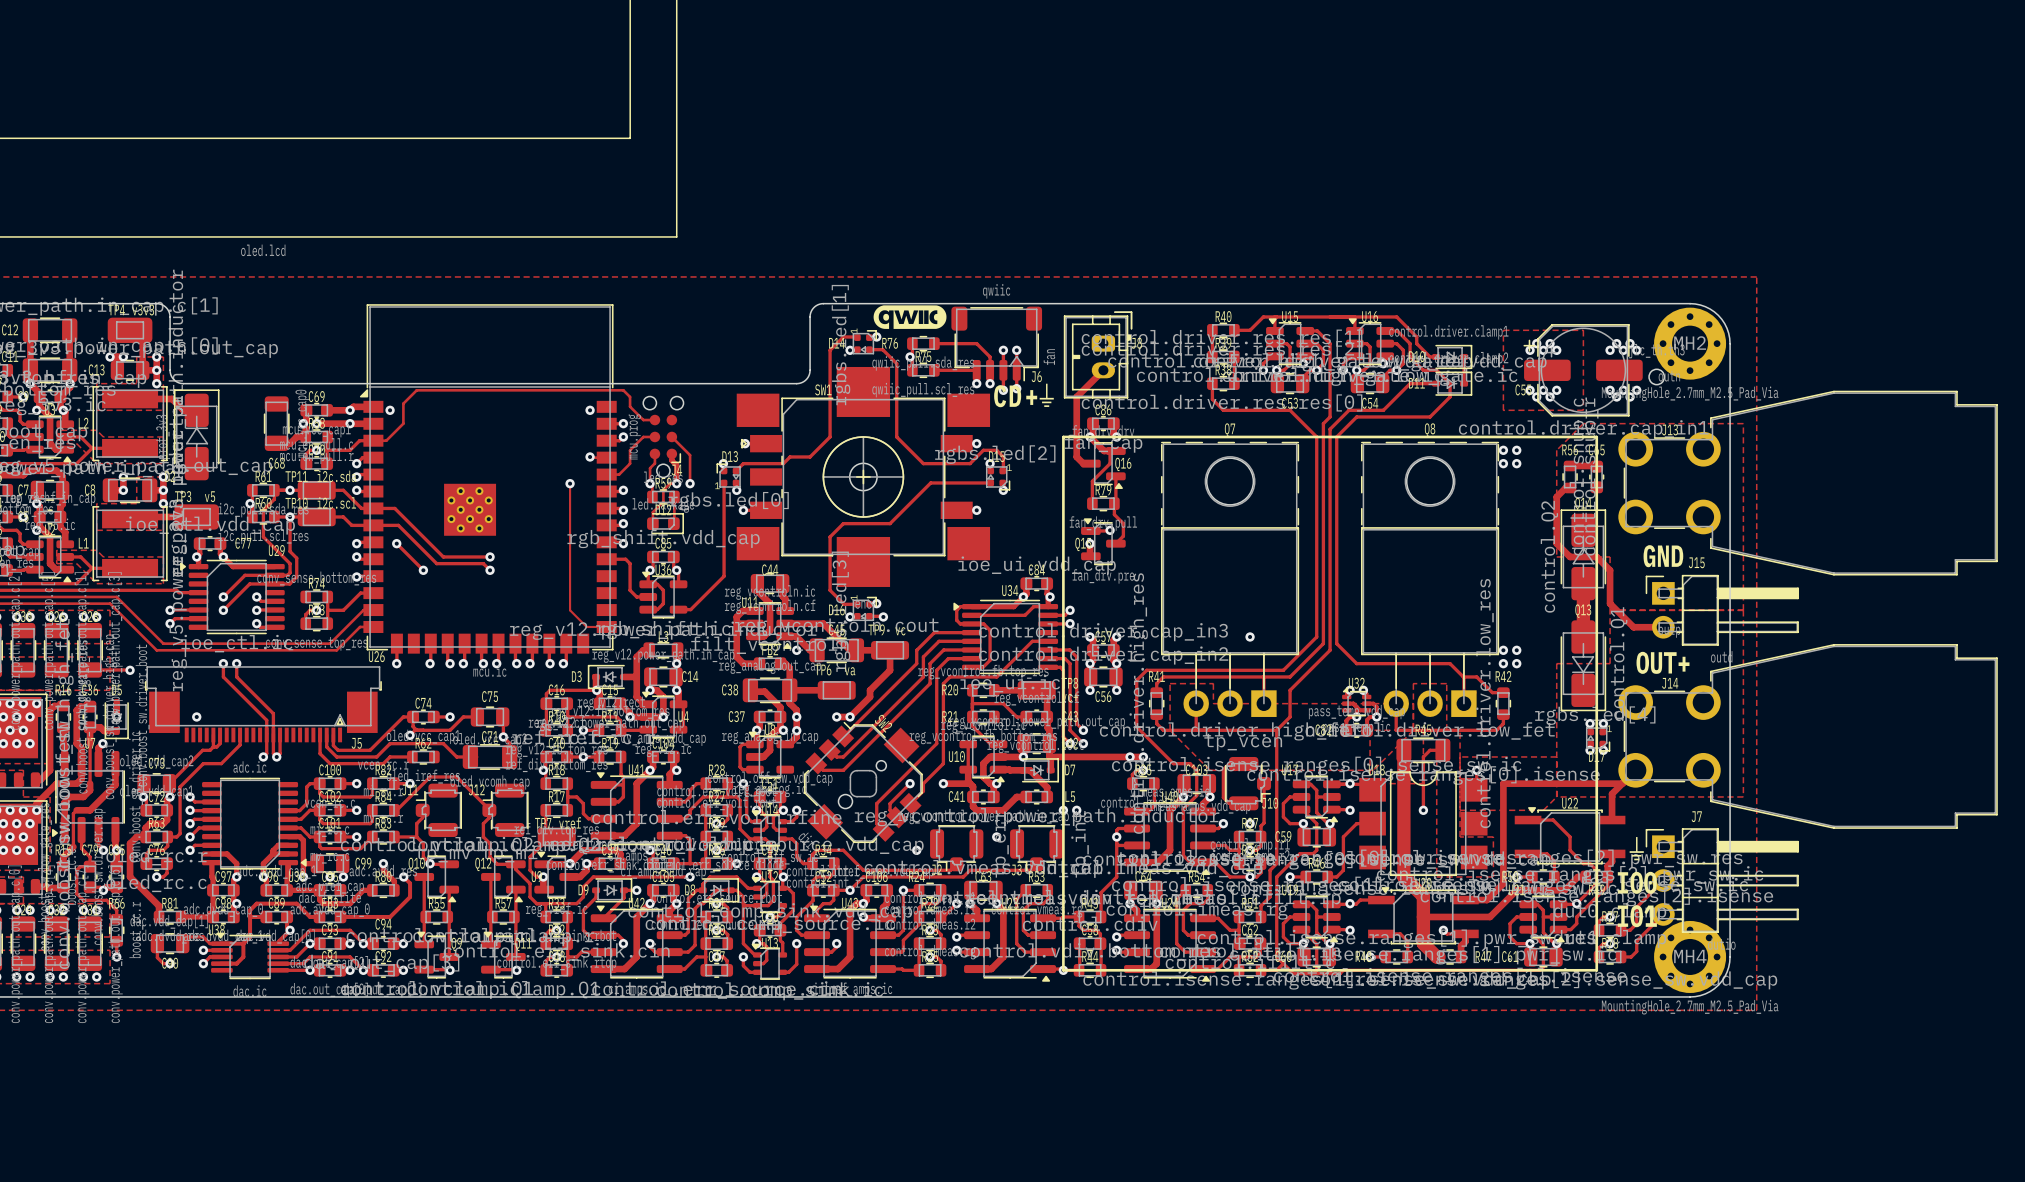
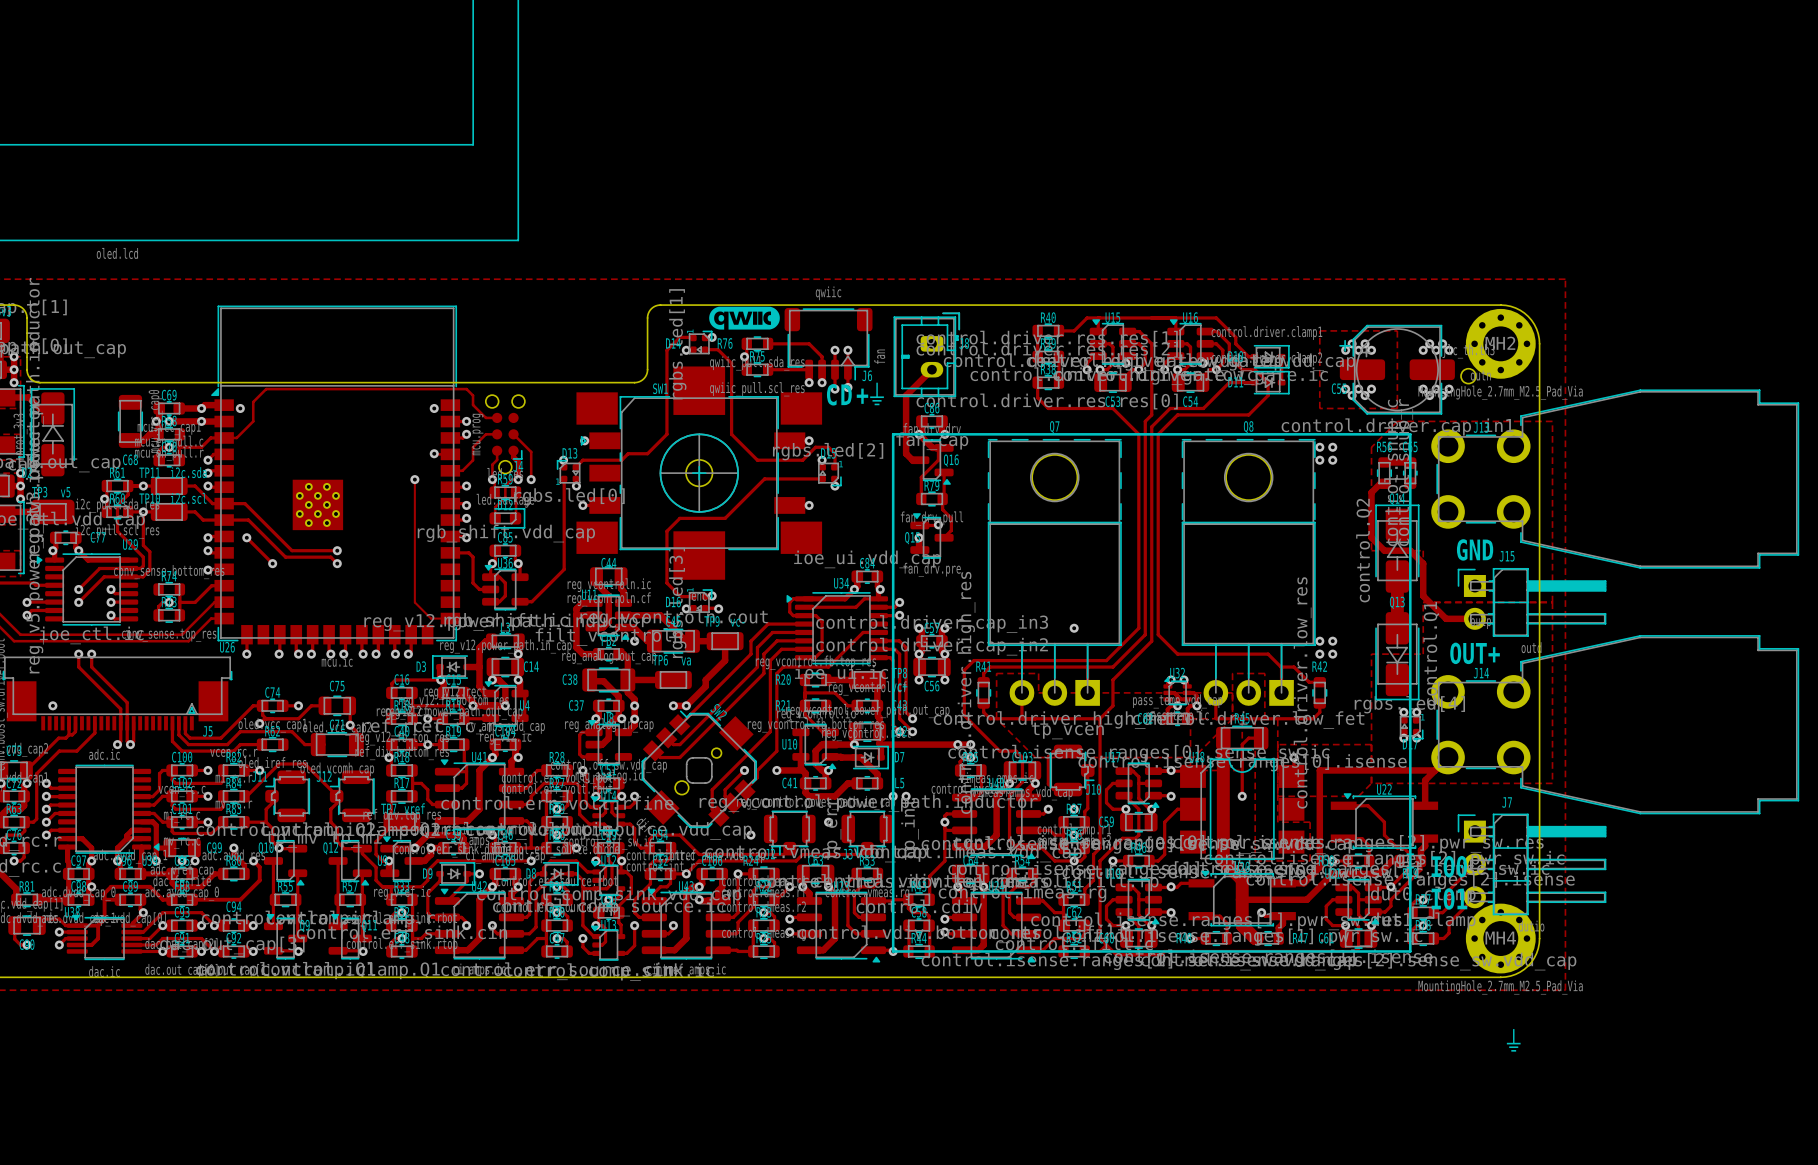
text position: ⏚ (1636, 848) -> ⏚ (1513, 1040)

